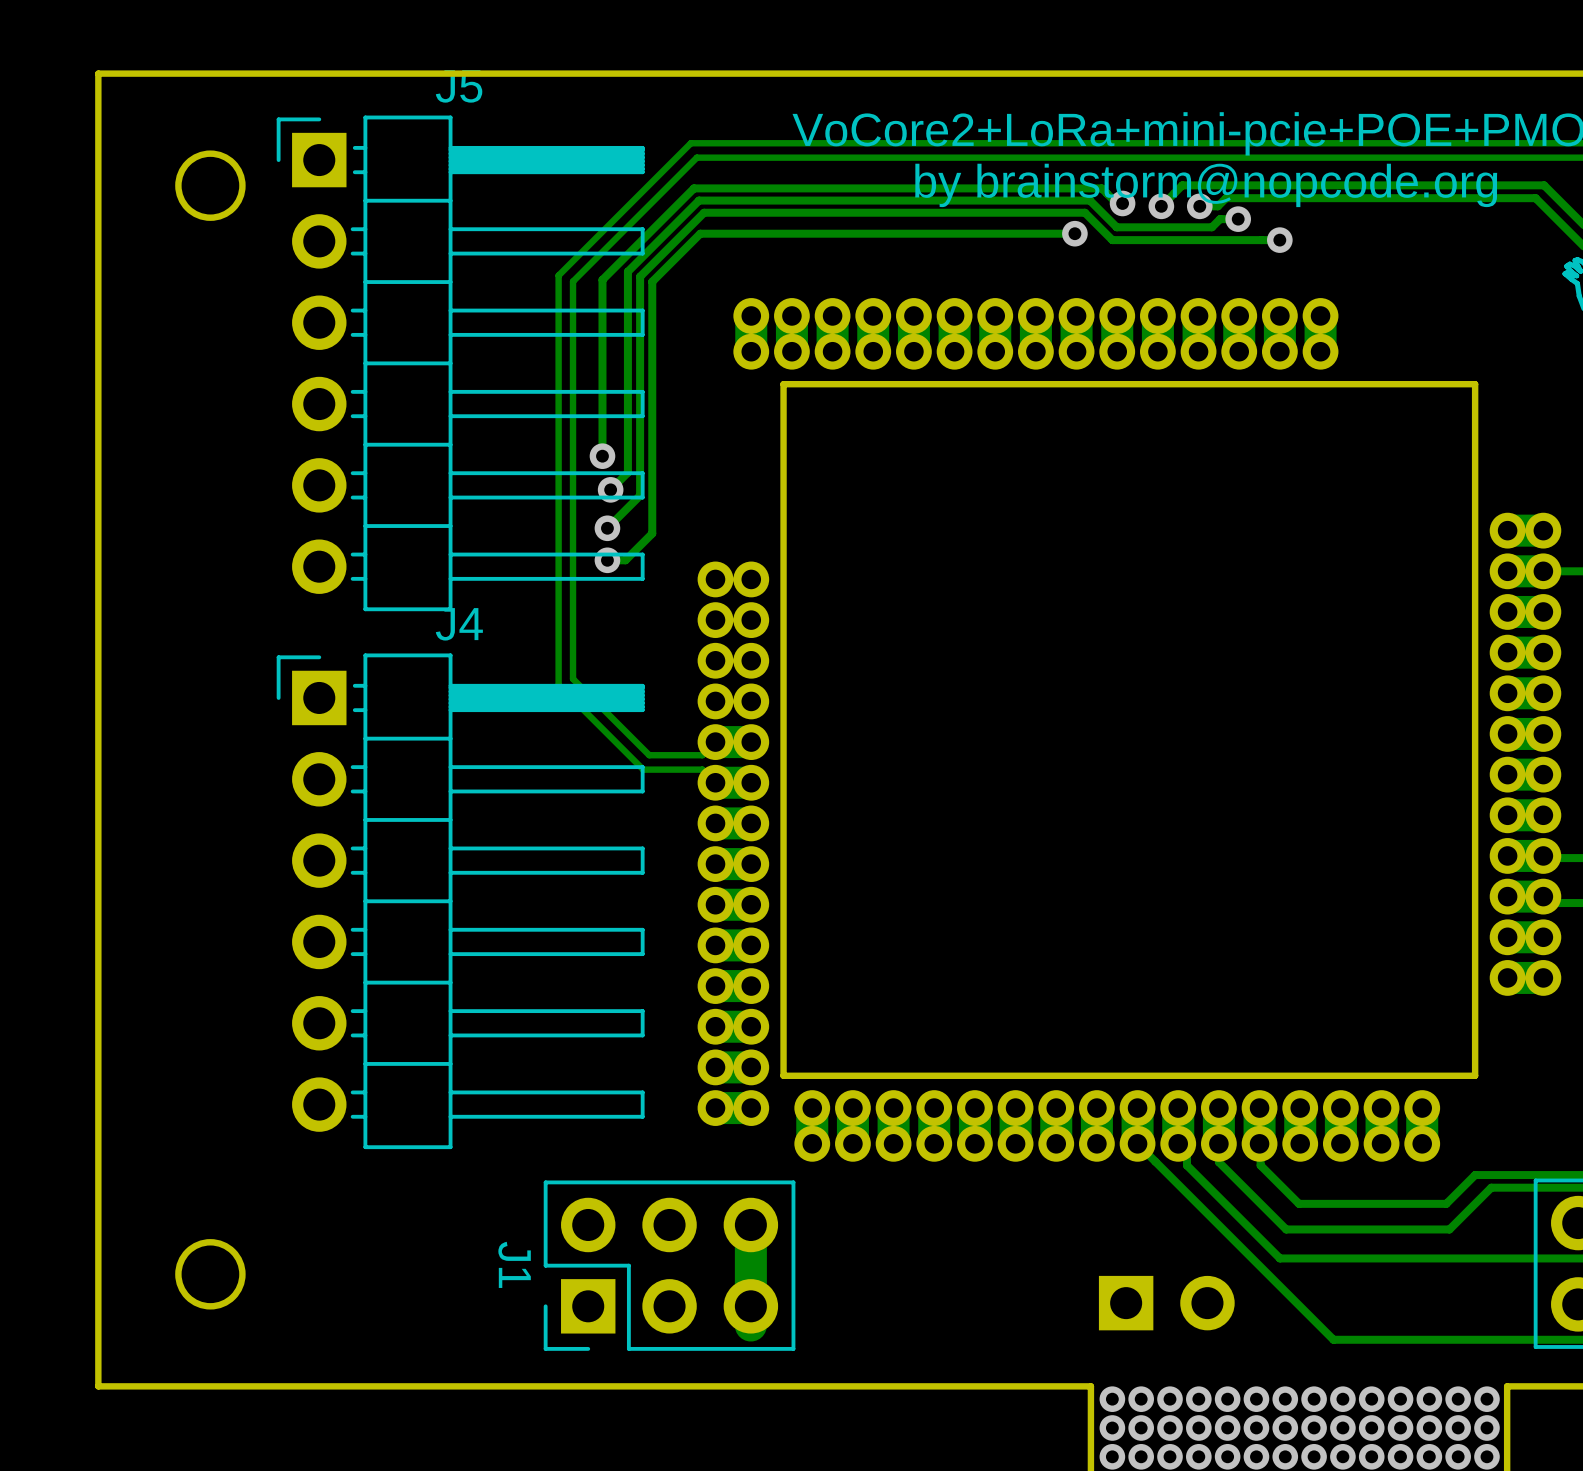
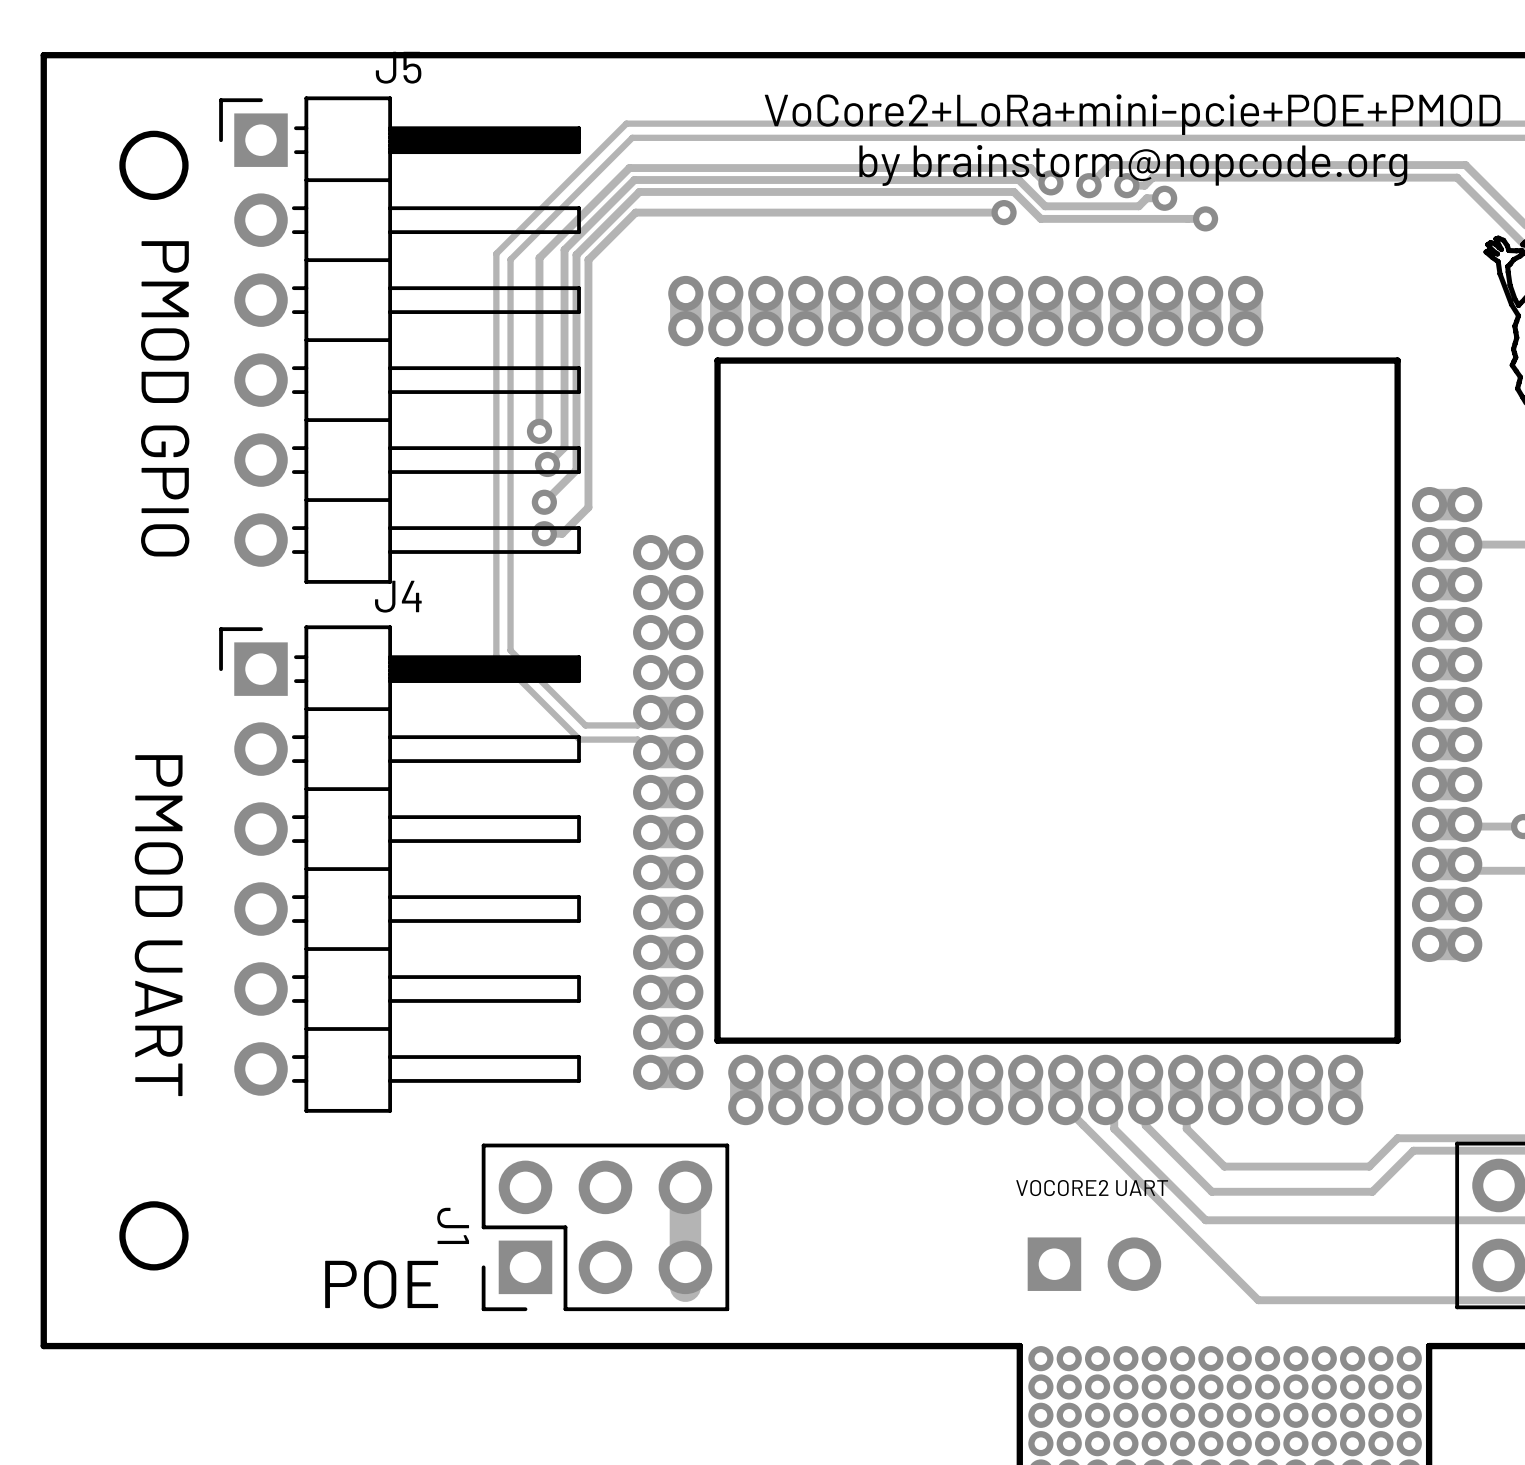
text: none -> PMOD GPIO (165, 398)
text: none -> PMOD UART (158, 925)
text: none -> VOCORE2 UART (1092, 1188)
text: none -> POE (381, 1284)

